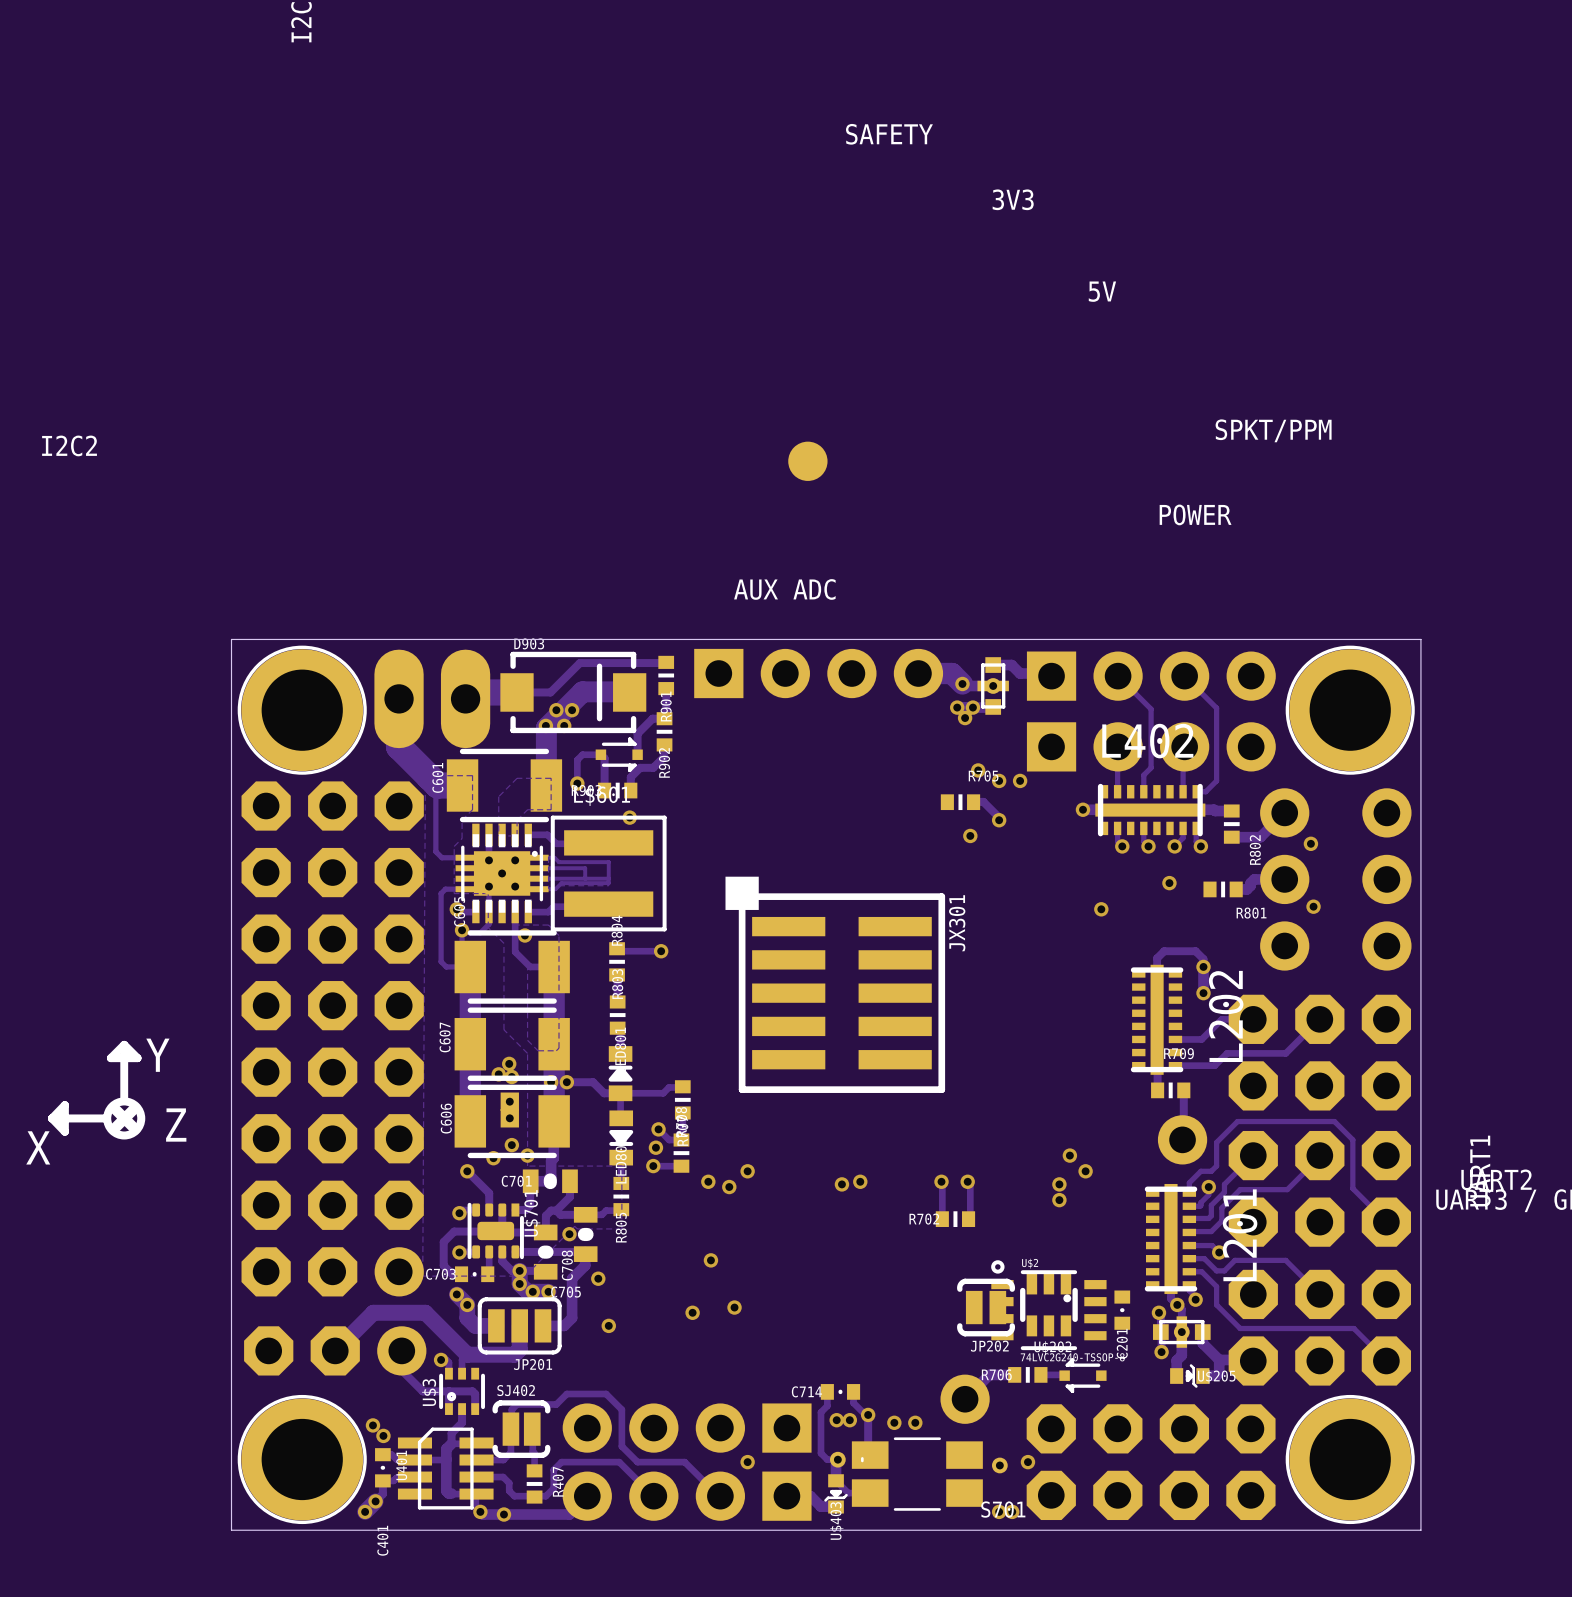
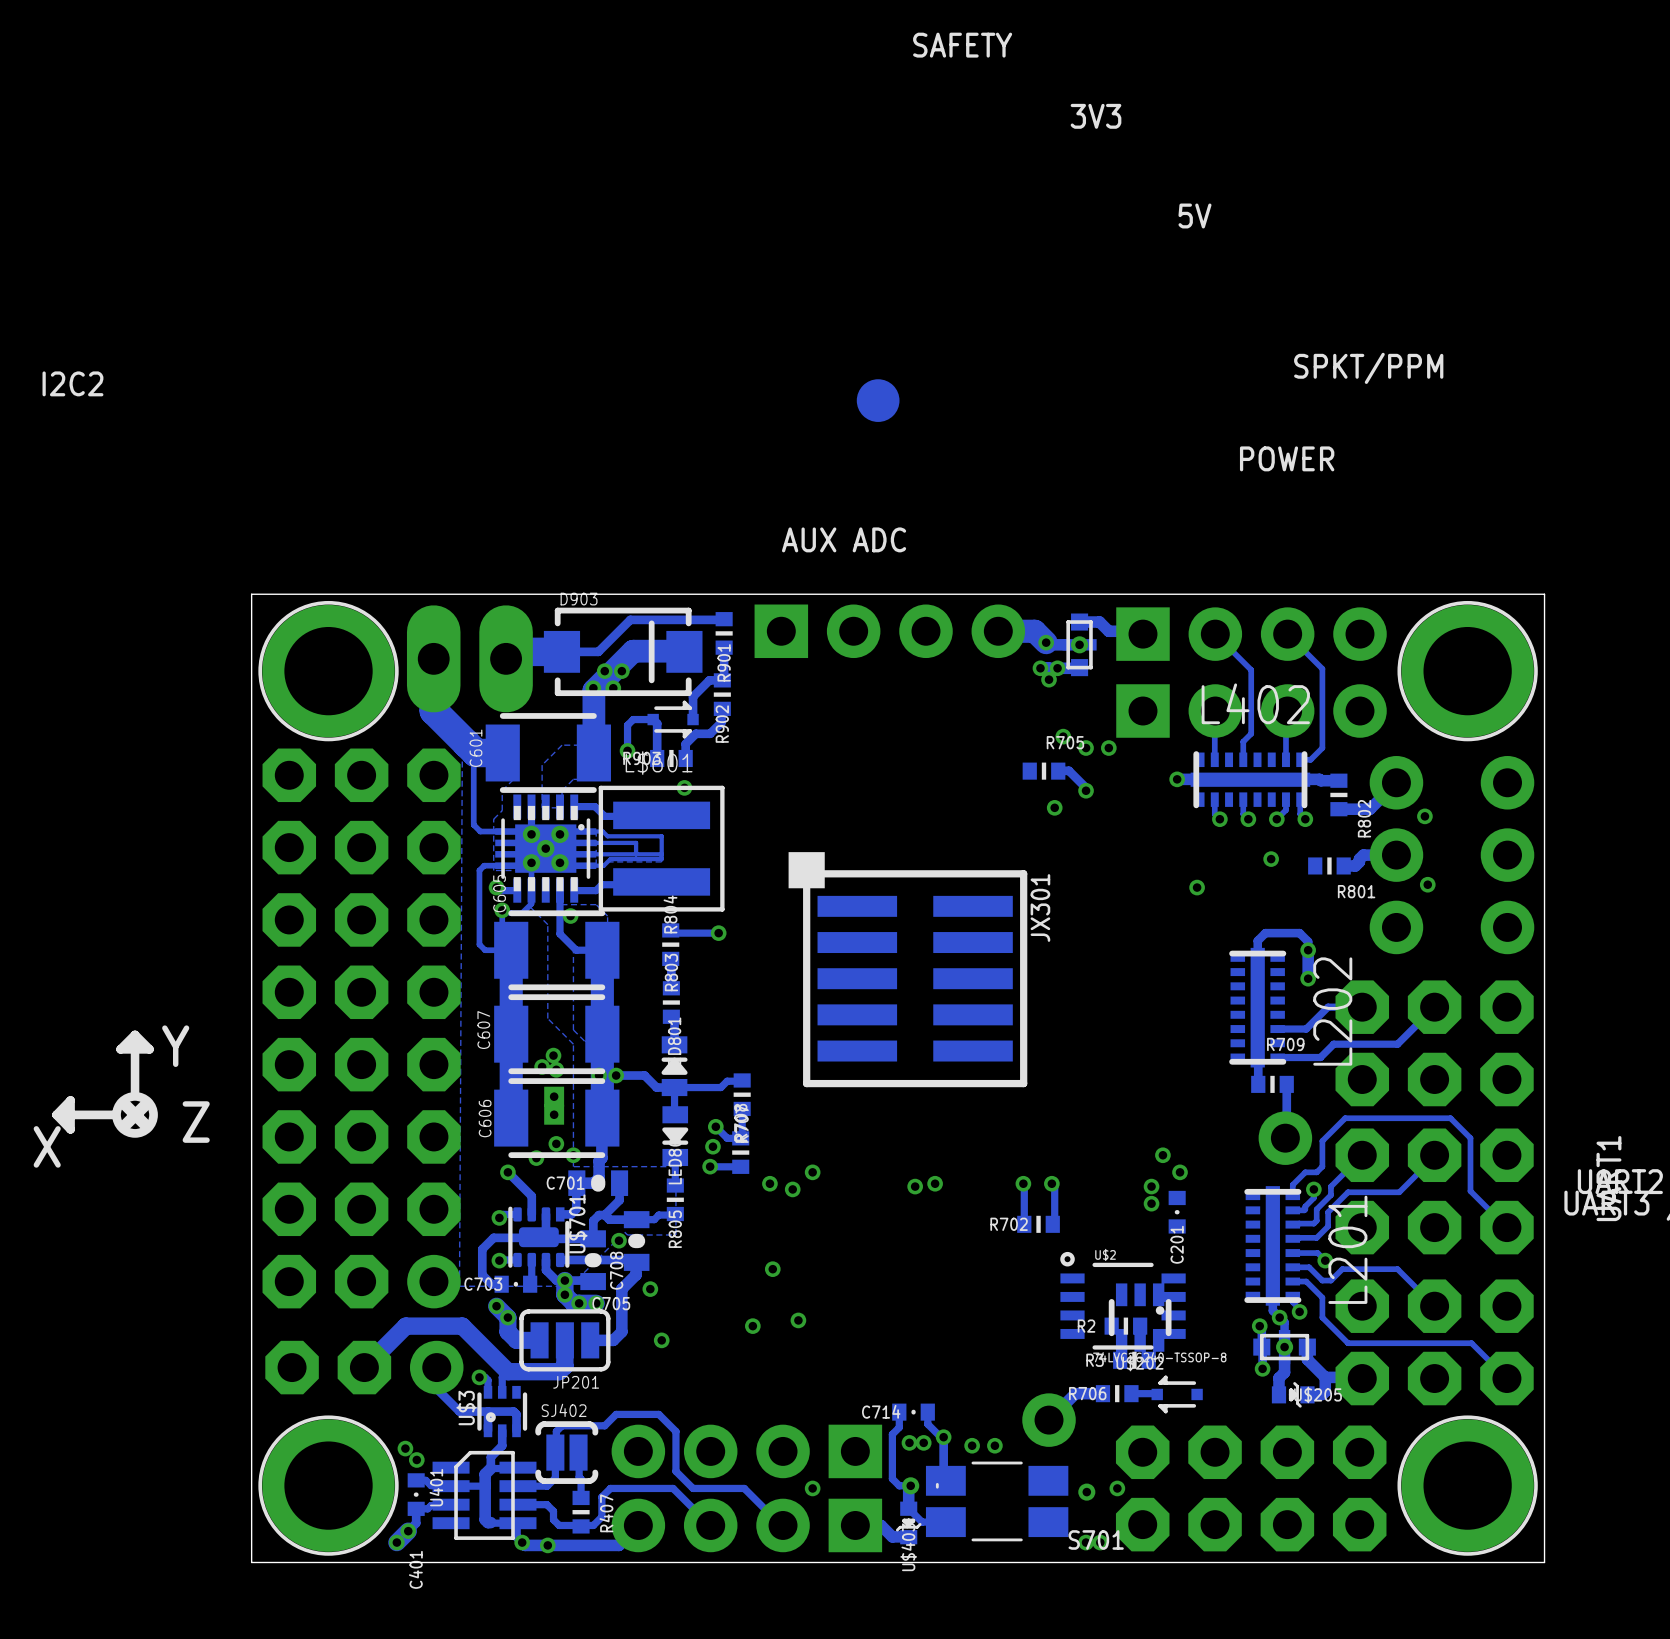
U$2 position: (1048, 1305) -> (1122, 1300)
JP202: (986, 1307) -> none
C201 position: (1122, 1310) -> (1177, 1212)
R2: none -> (1125, 1326)
R3: none -> (1134, 1360)

